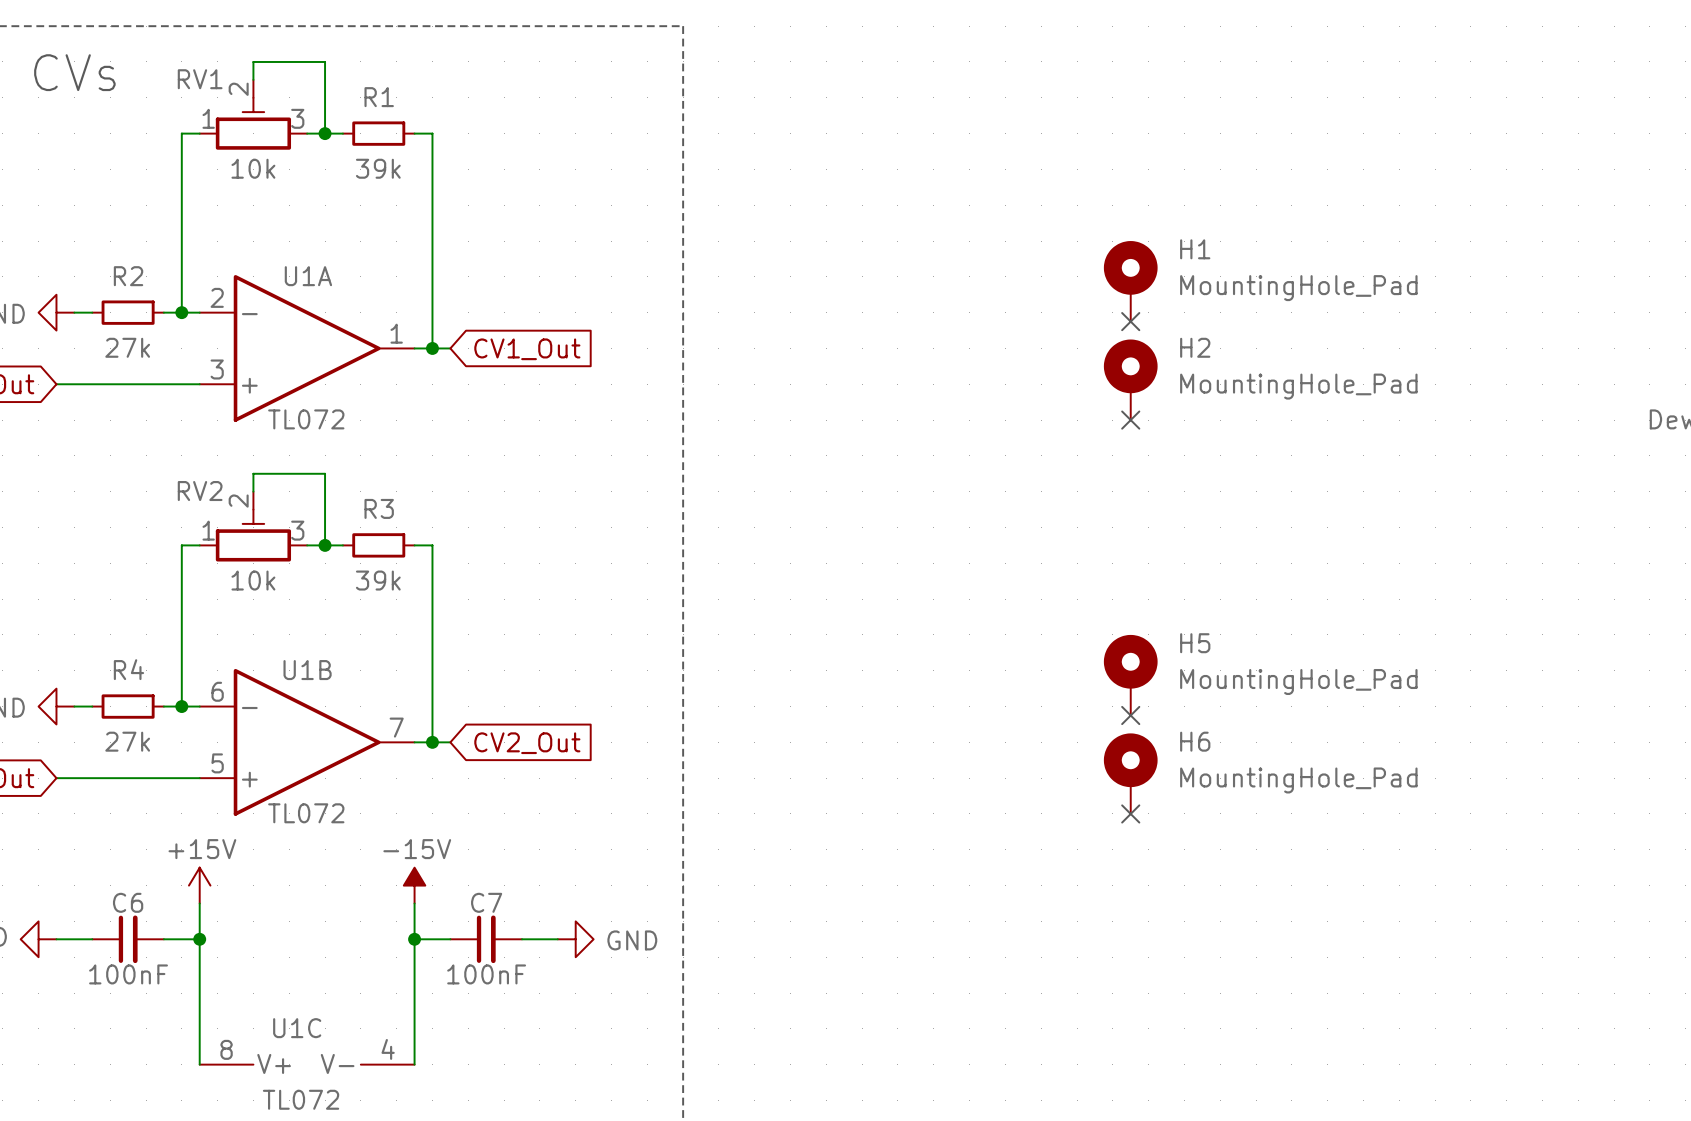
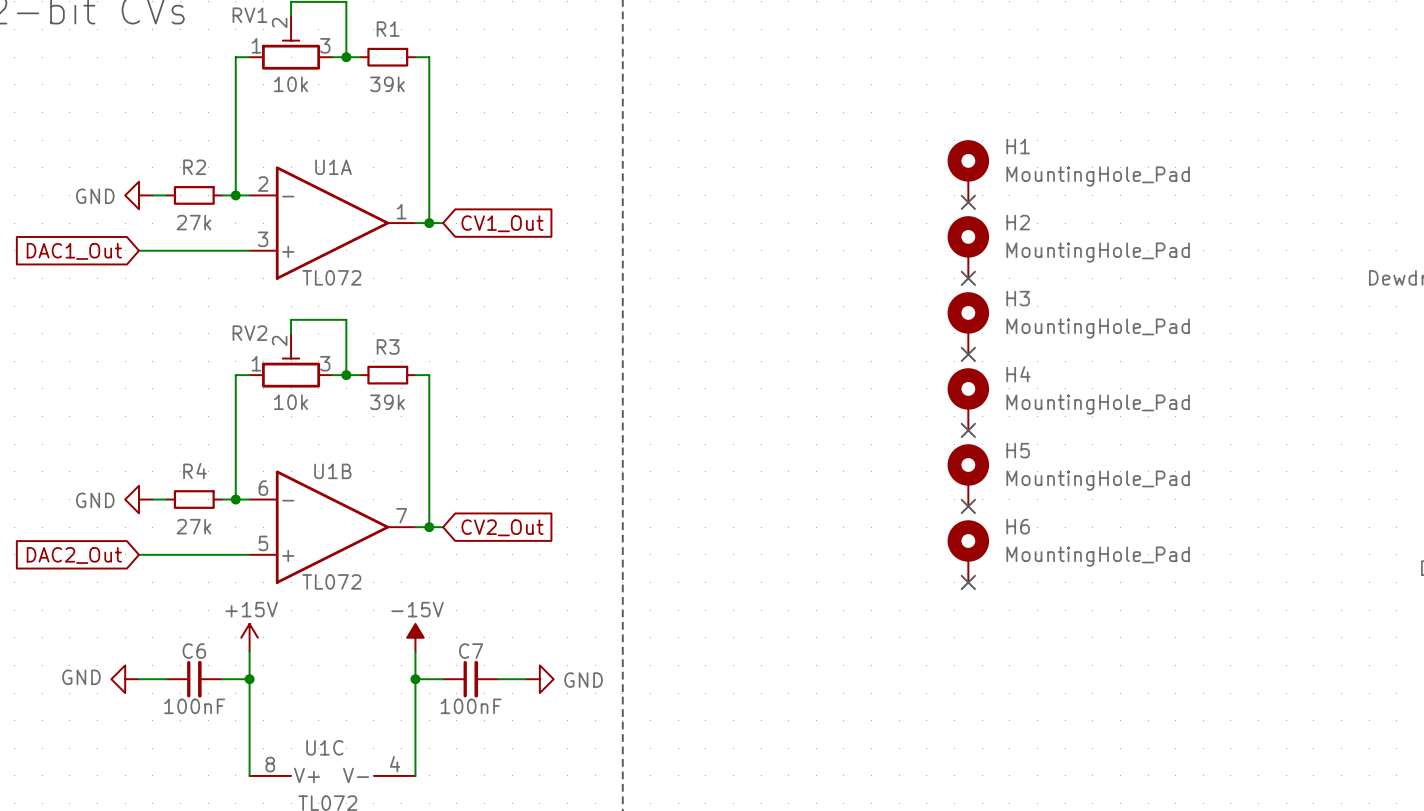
H3: none -> MountingHole_Pad (968, 323)
no-connect mark: none -> (968, 354)
H4: none -> MountingHole_Pad (968, 399)
no-connect mark: none -> (968, 430)

